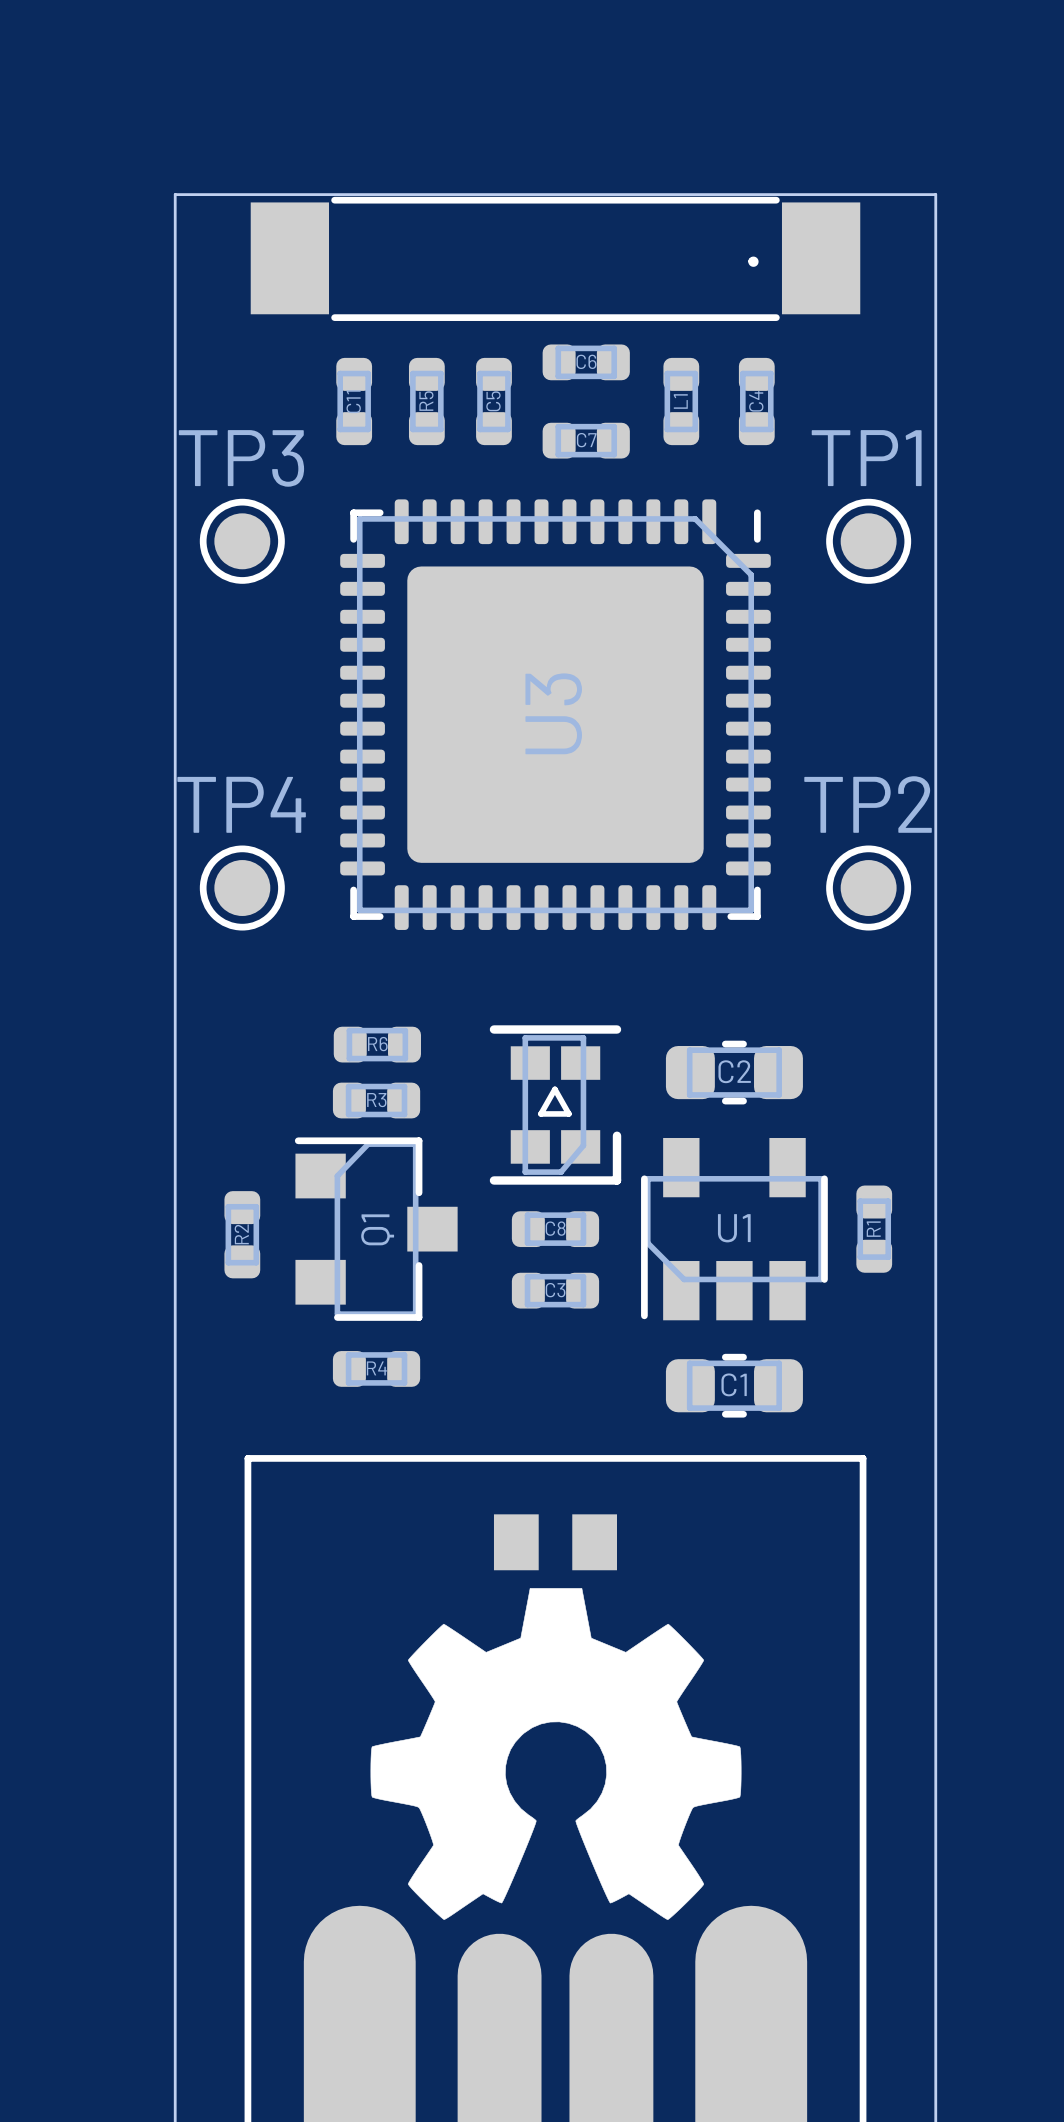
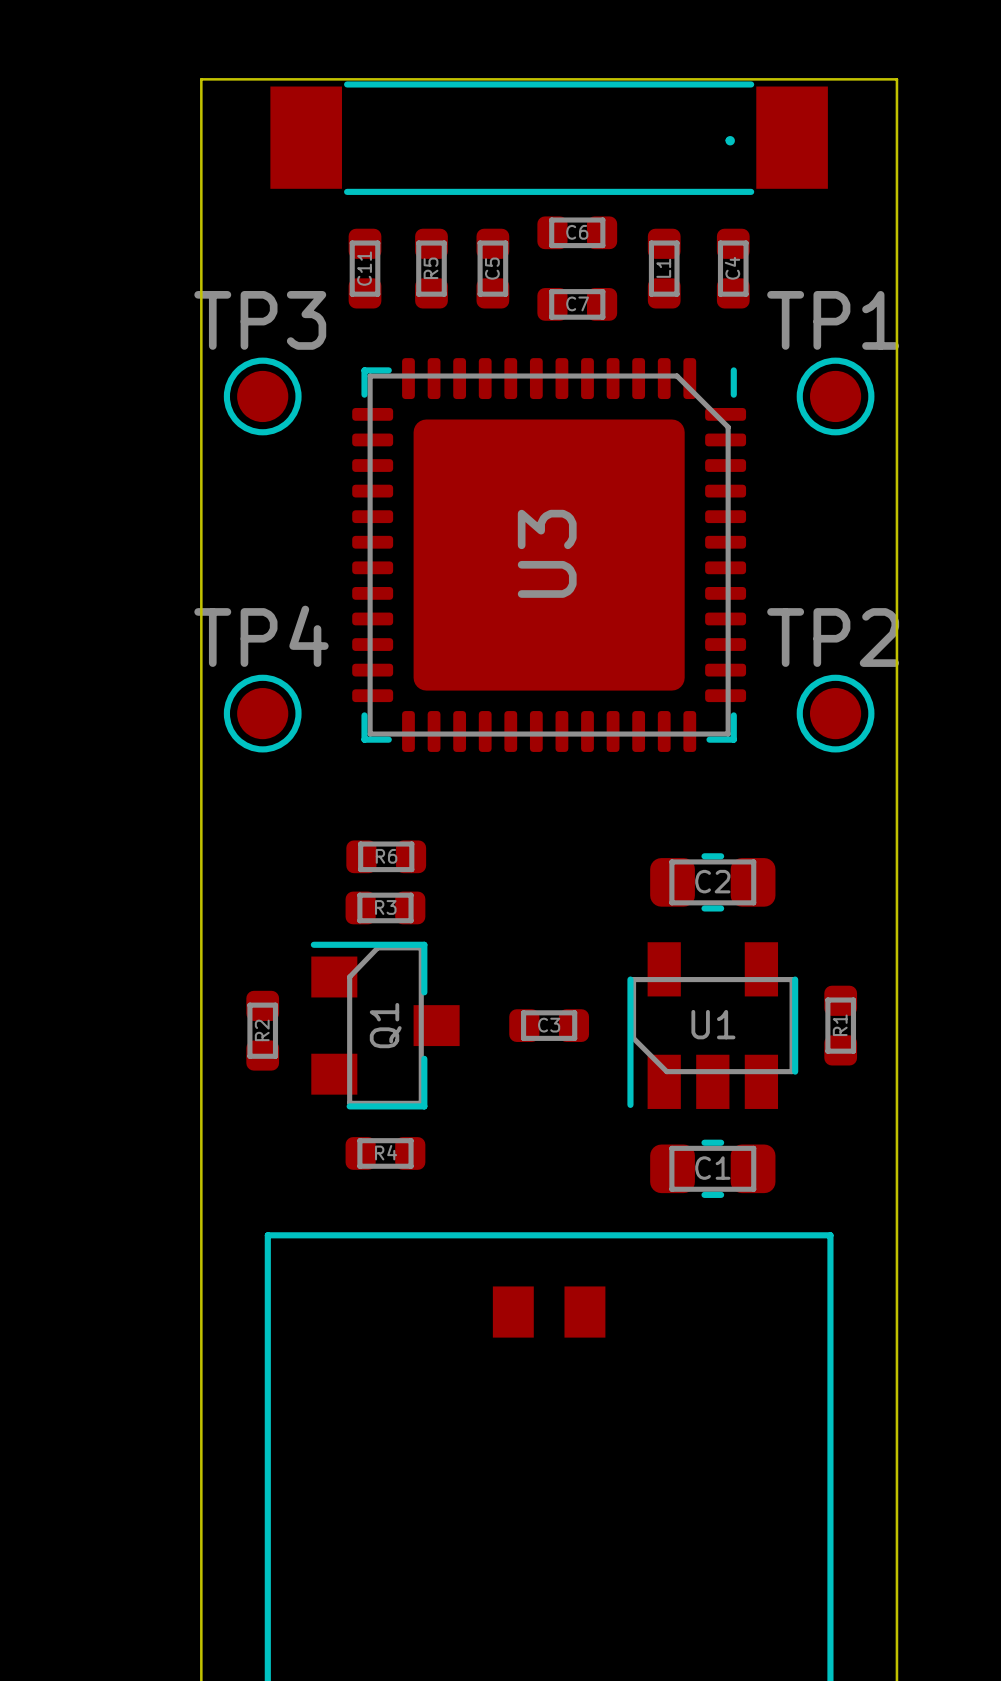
part: (555, 1104) -> none
C8 name: C8 (555, 1228) -> C3 (549, 1025)
C3: (555, 1290) -> none
drawing: [370, 1588, 742, 1920] -> none

